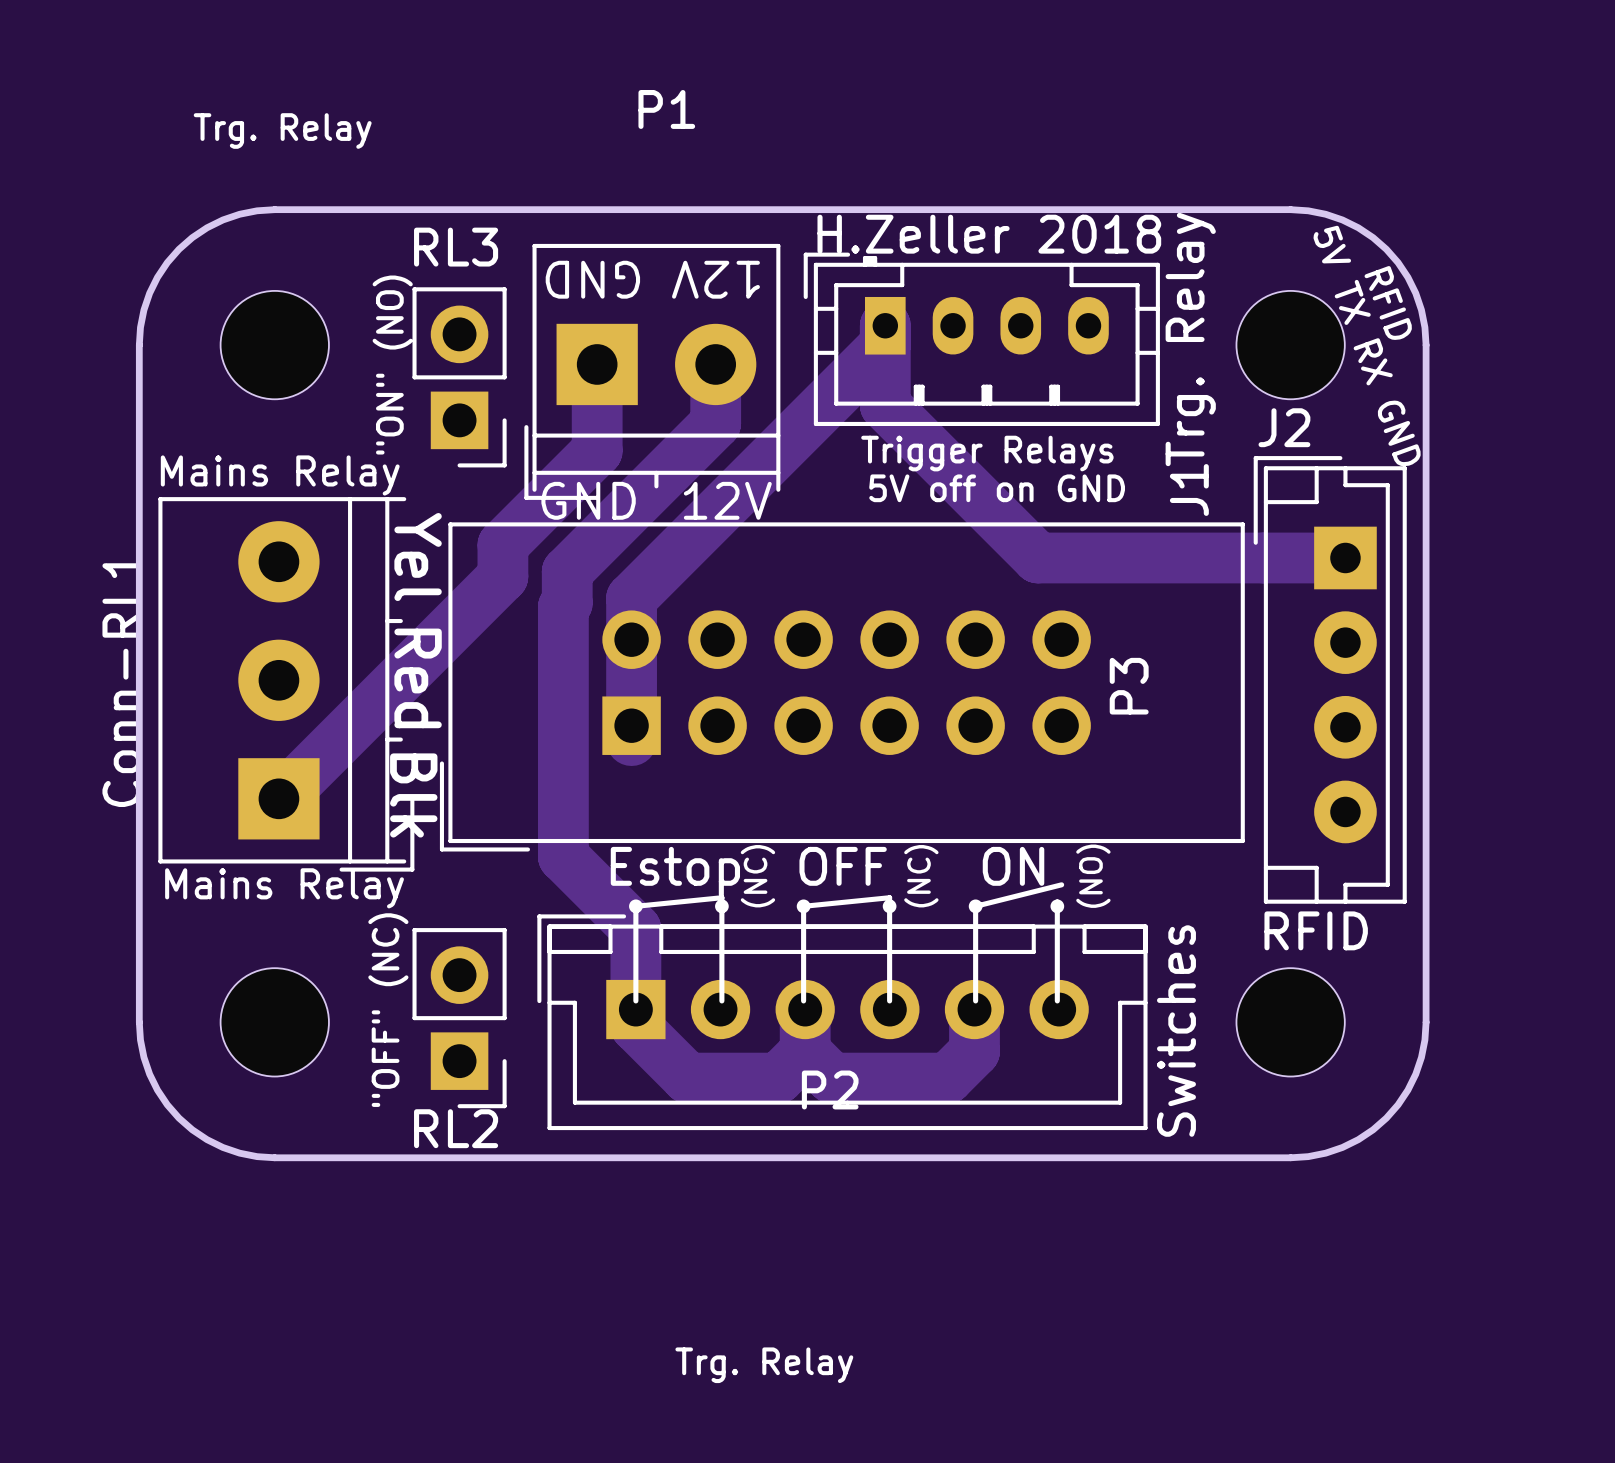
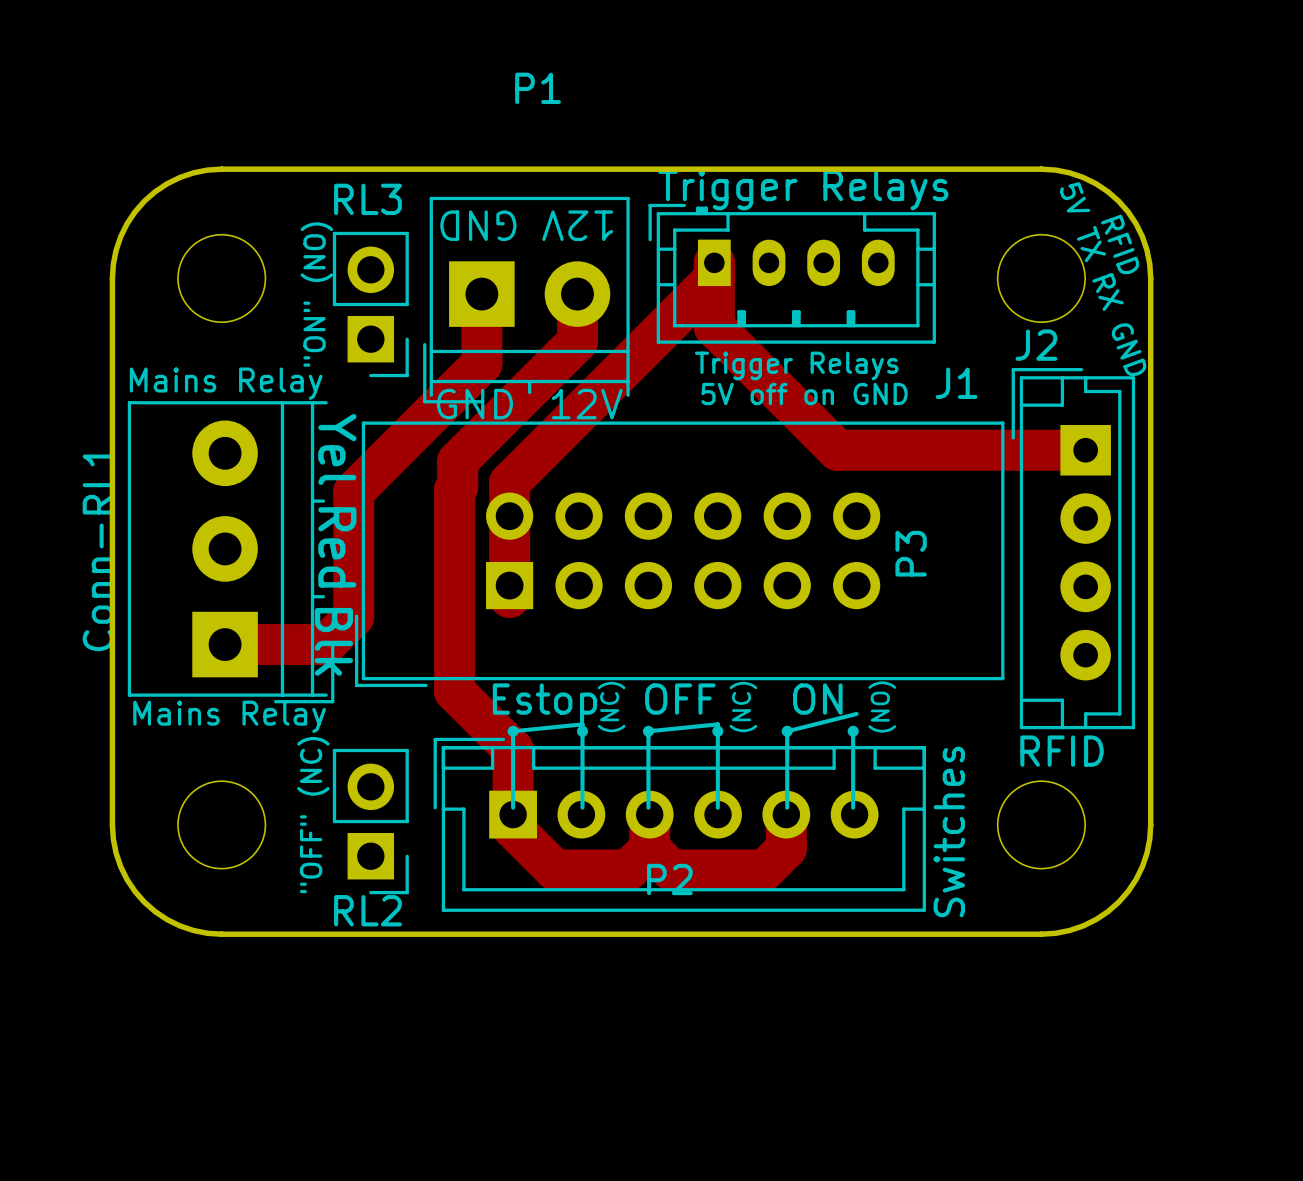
text: Trg. Relay (282, 131) -> none
text: H.Zeller 2018 (989, 234) -> Trigger Relays (803, 190)
text: Trg. Relay (1190, 339) -> none
J1 name rotation: 0° (1189, 489) -> 90° clockwise (956, 383)
track: (502, 545) (502, 576) (280, 798) -> (405, 439) (353, 491) (353, 616) (325, 644) (226, 644)
text: Trg. Relay (764, 1365) -> none

